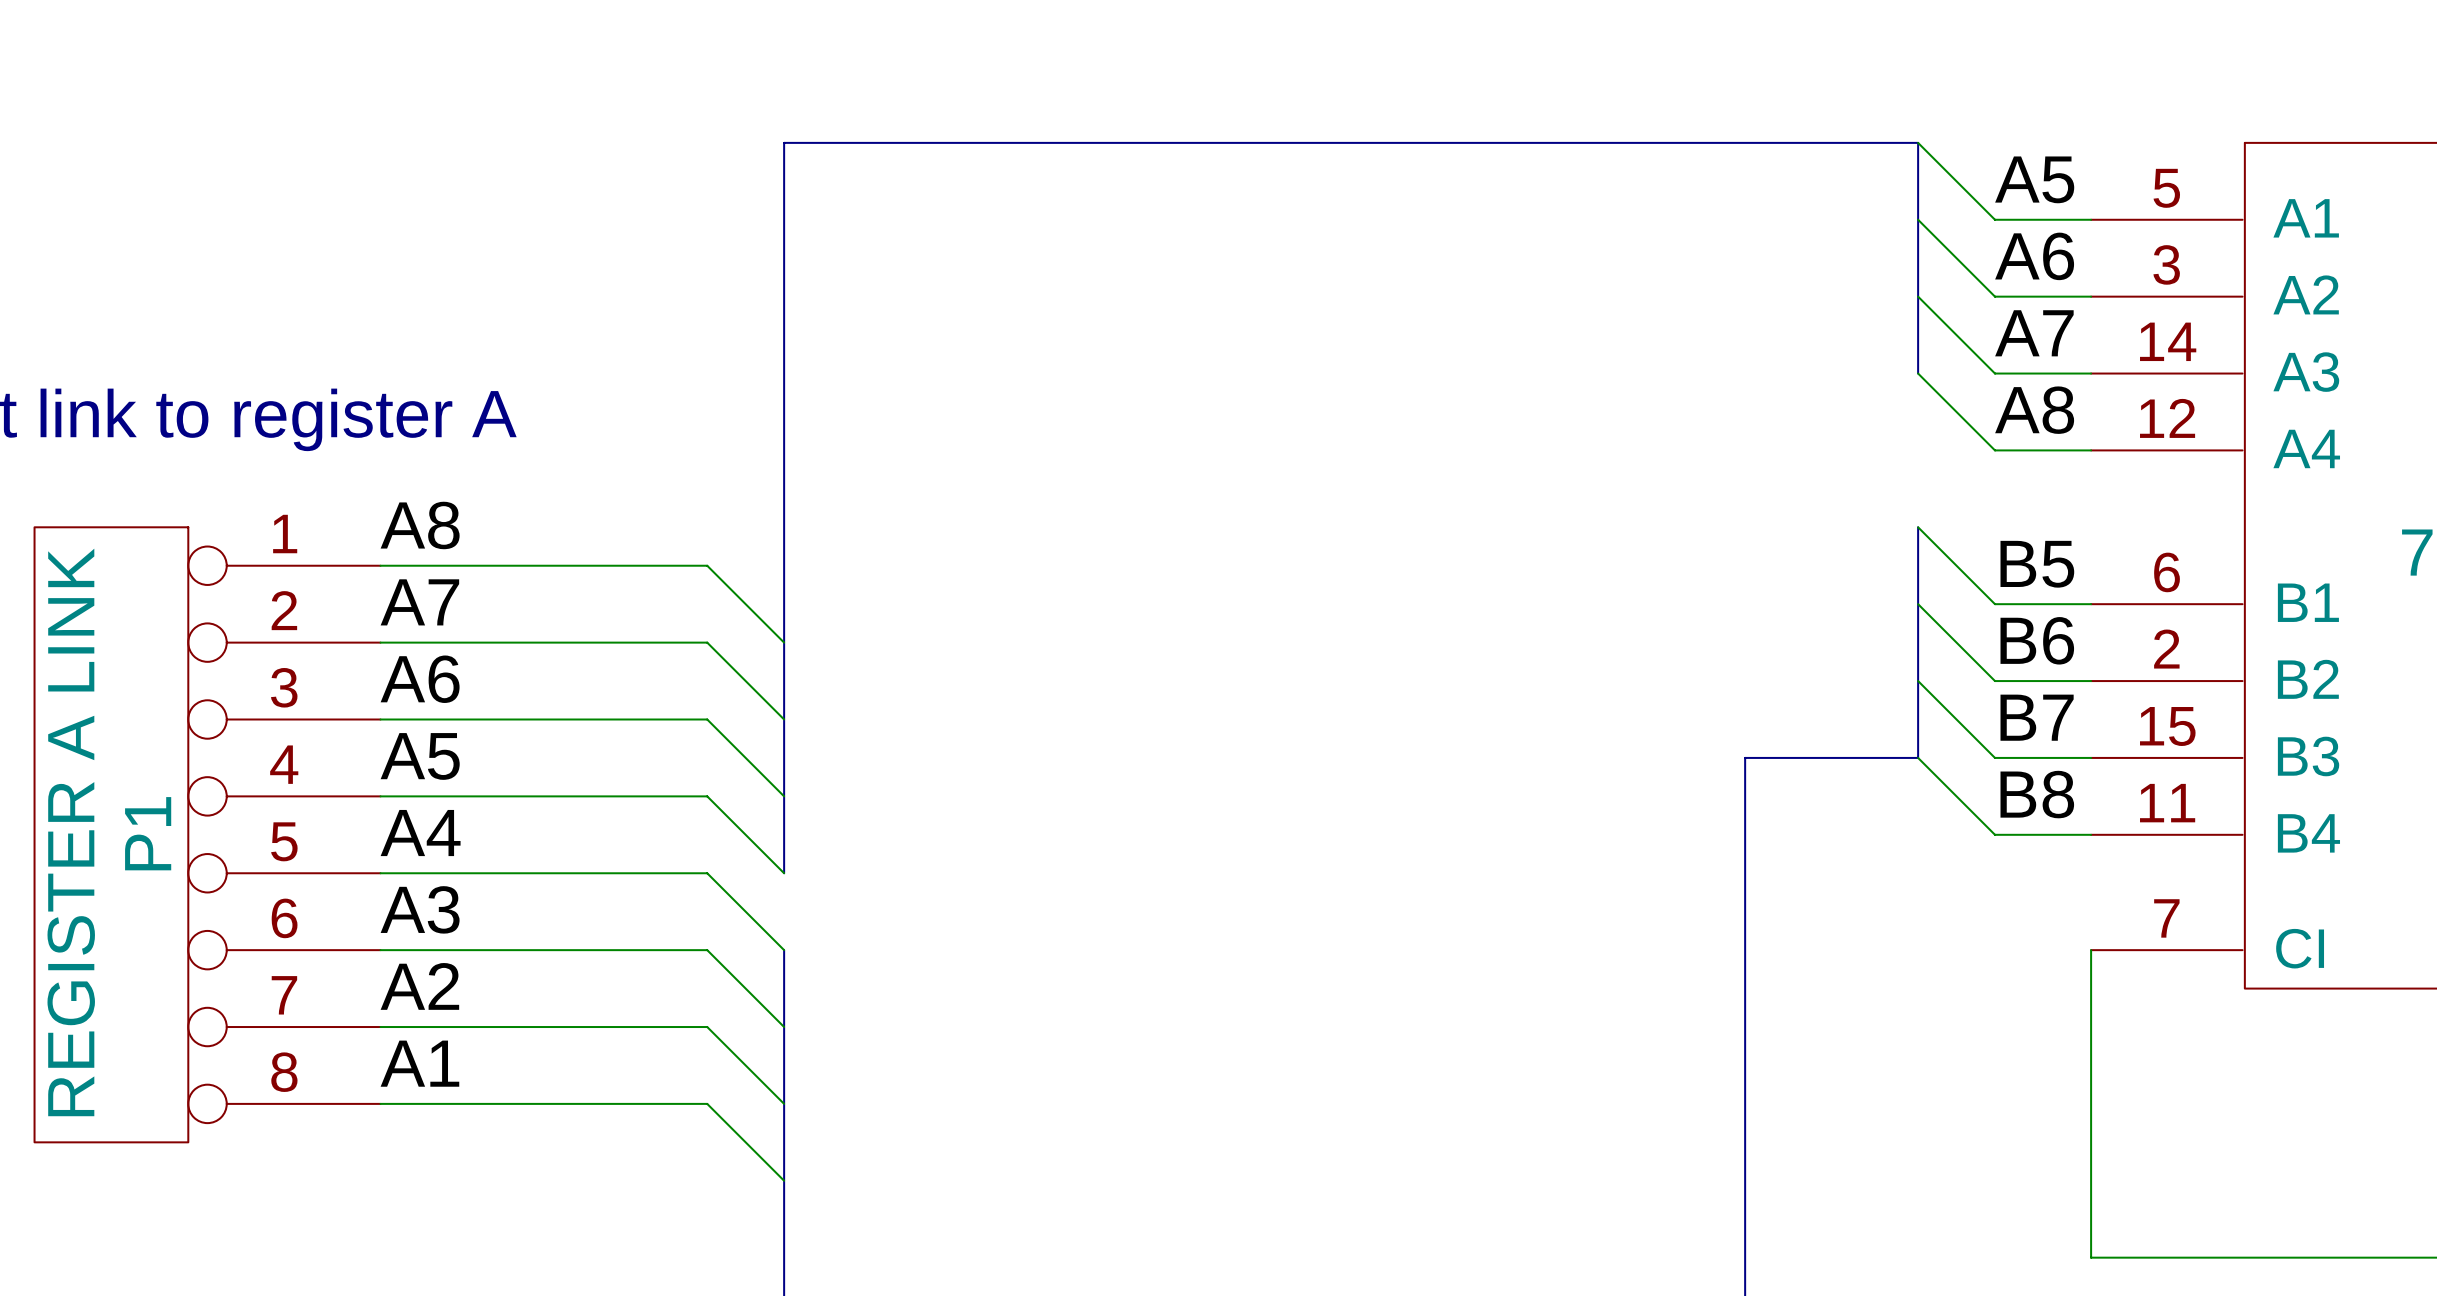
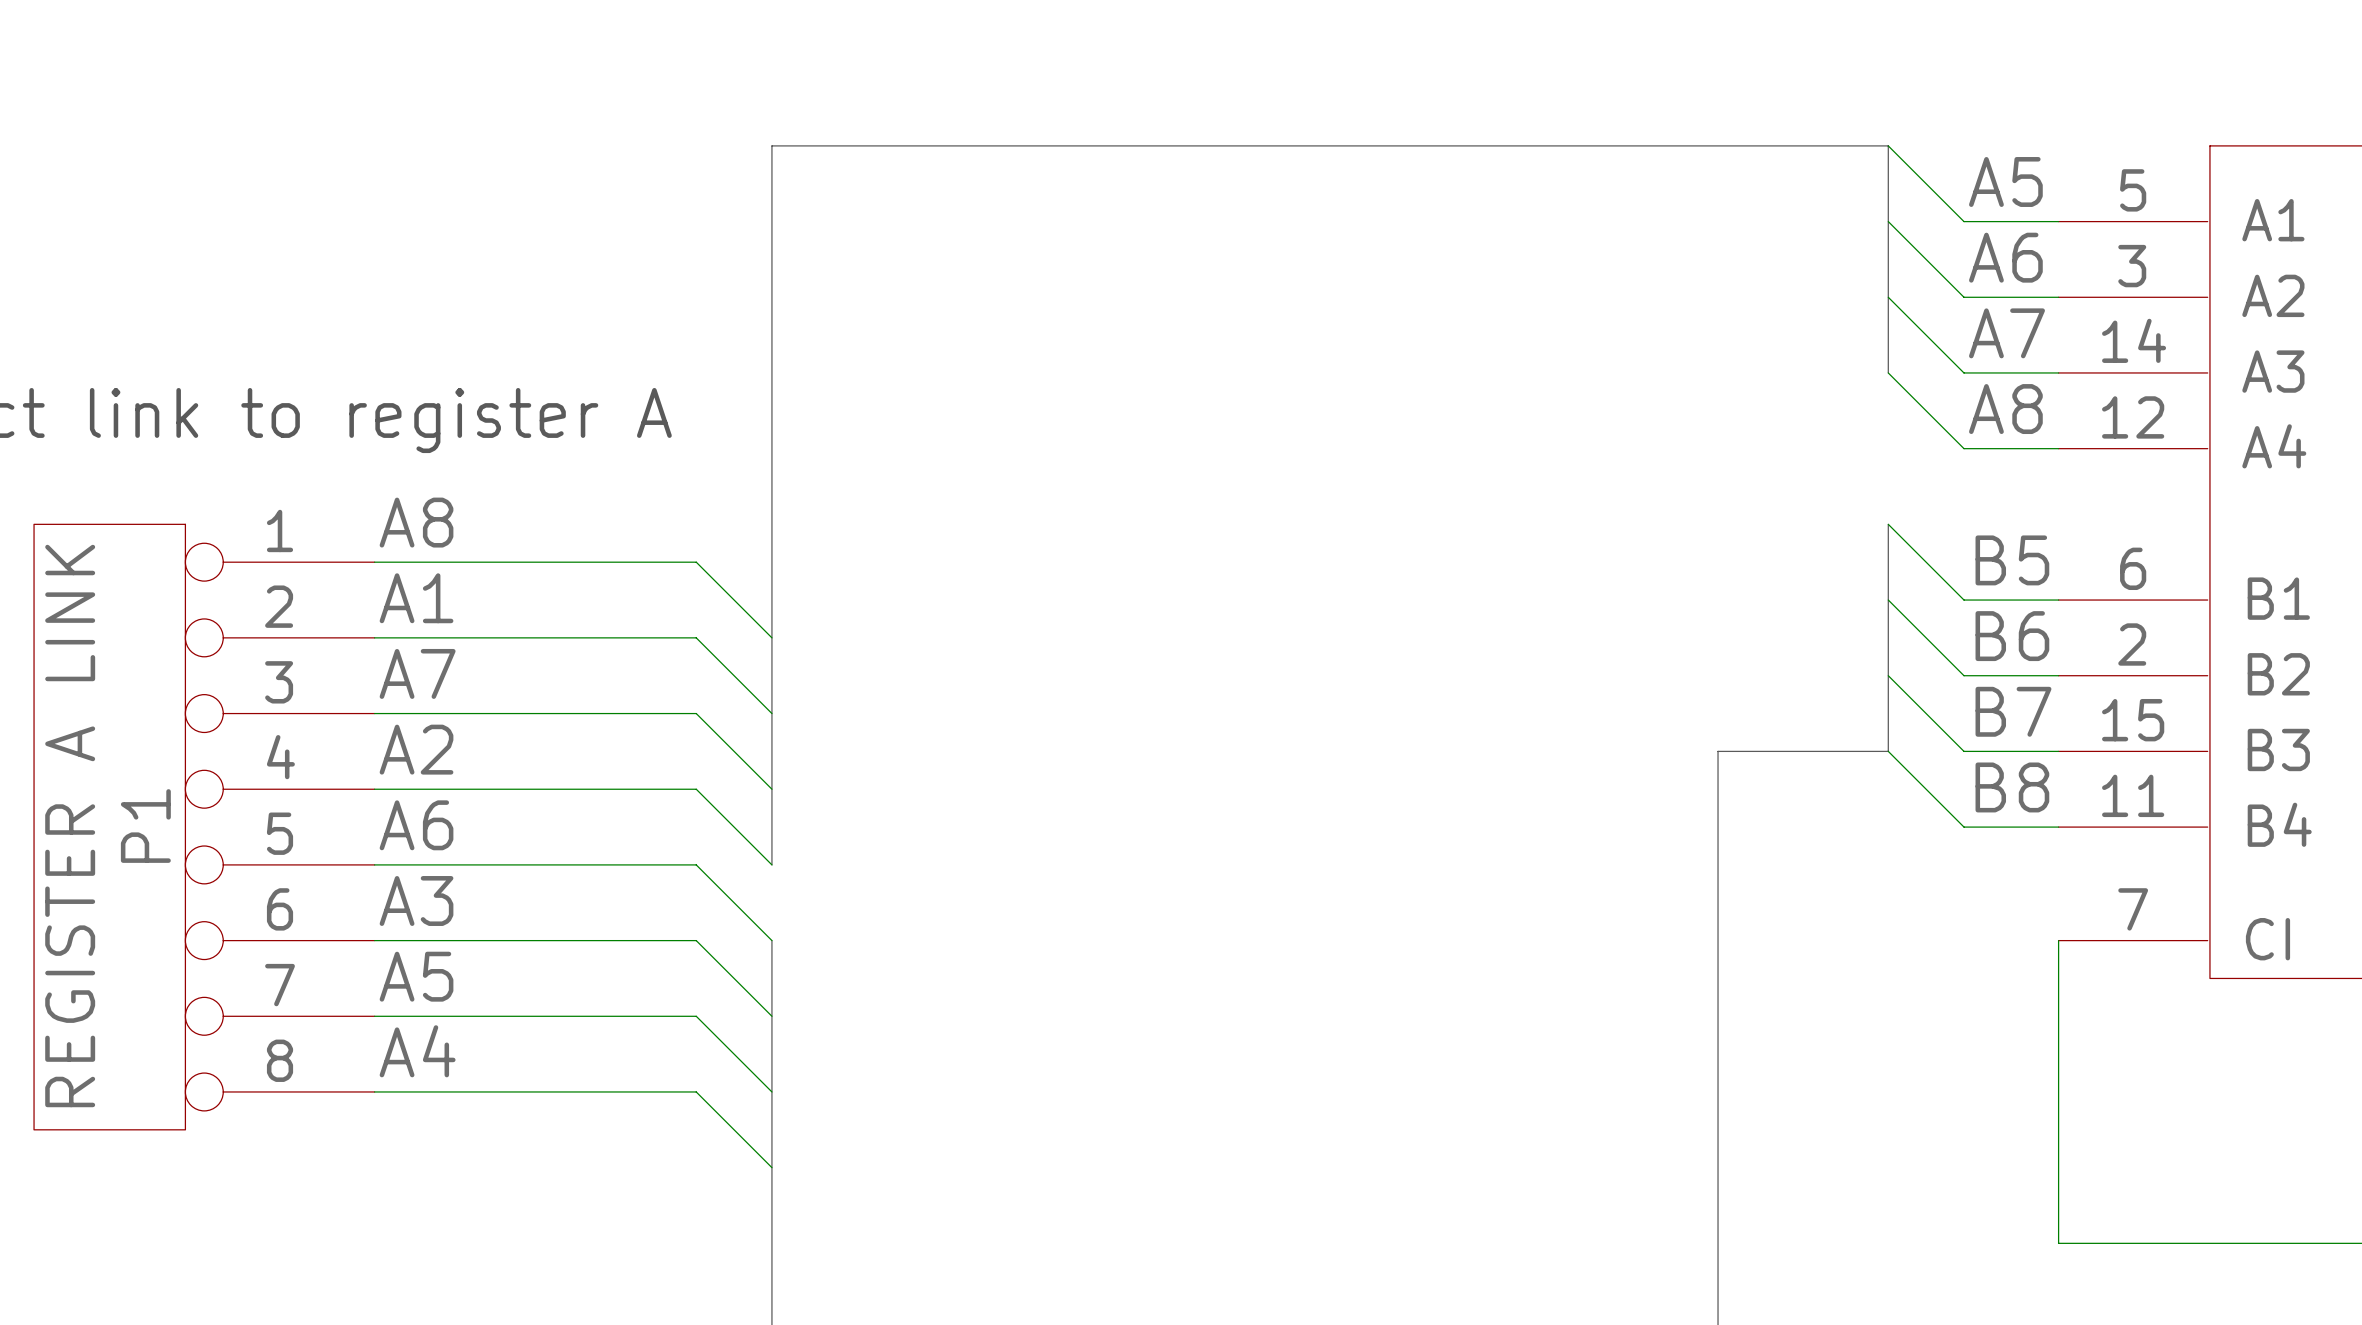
label: A7 (419, 602) -> A1 (416, 598)
label: A6 (420, 679) -> A7 (417, 673)
label: A5 (420, 756) -> A2 (416, 749)
label: A4 (420, 833) -> A6 (416, 825)
label: A2 (419, 986) -> A5 (416, 976)
label: A1 (419, 1063) -> A4 (417, 1051)

